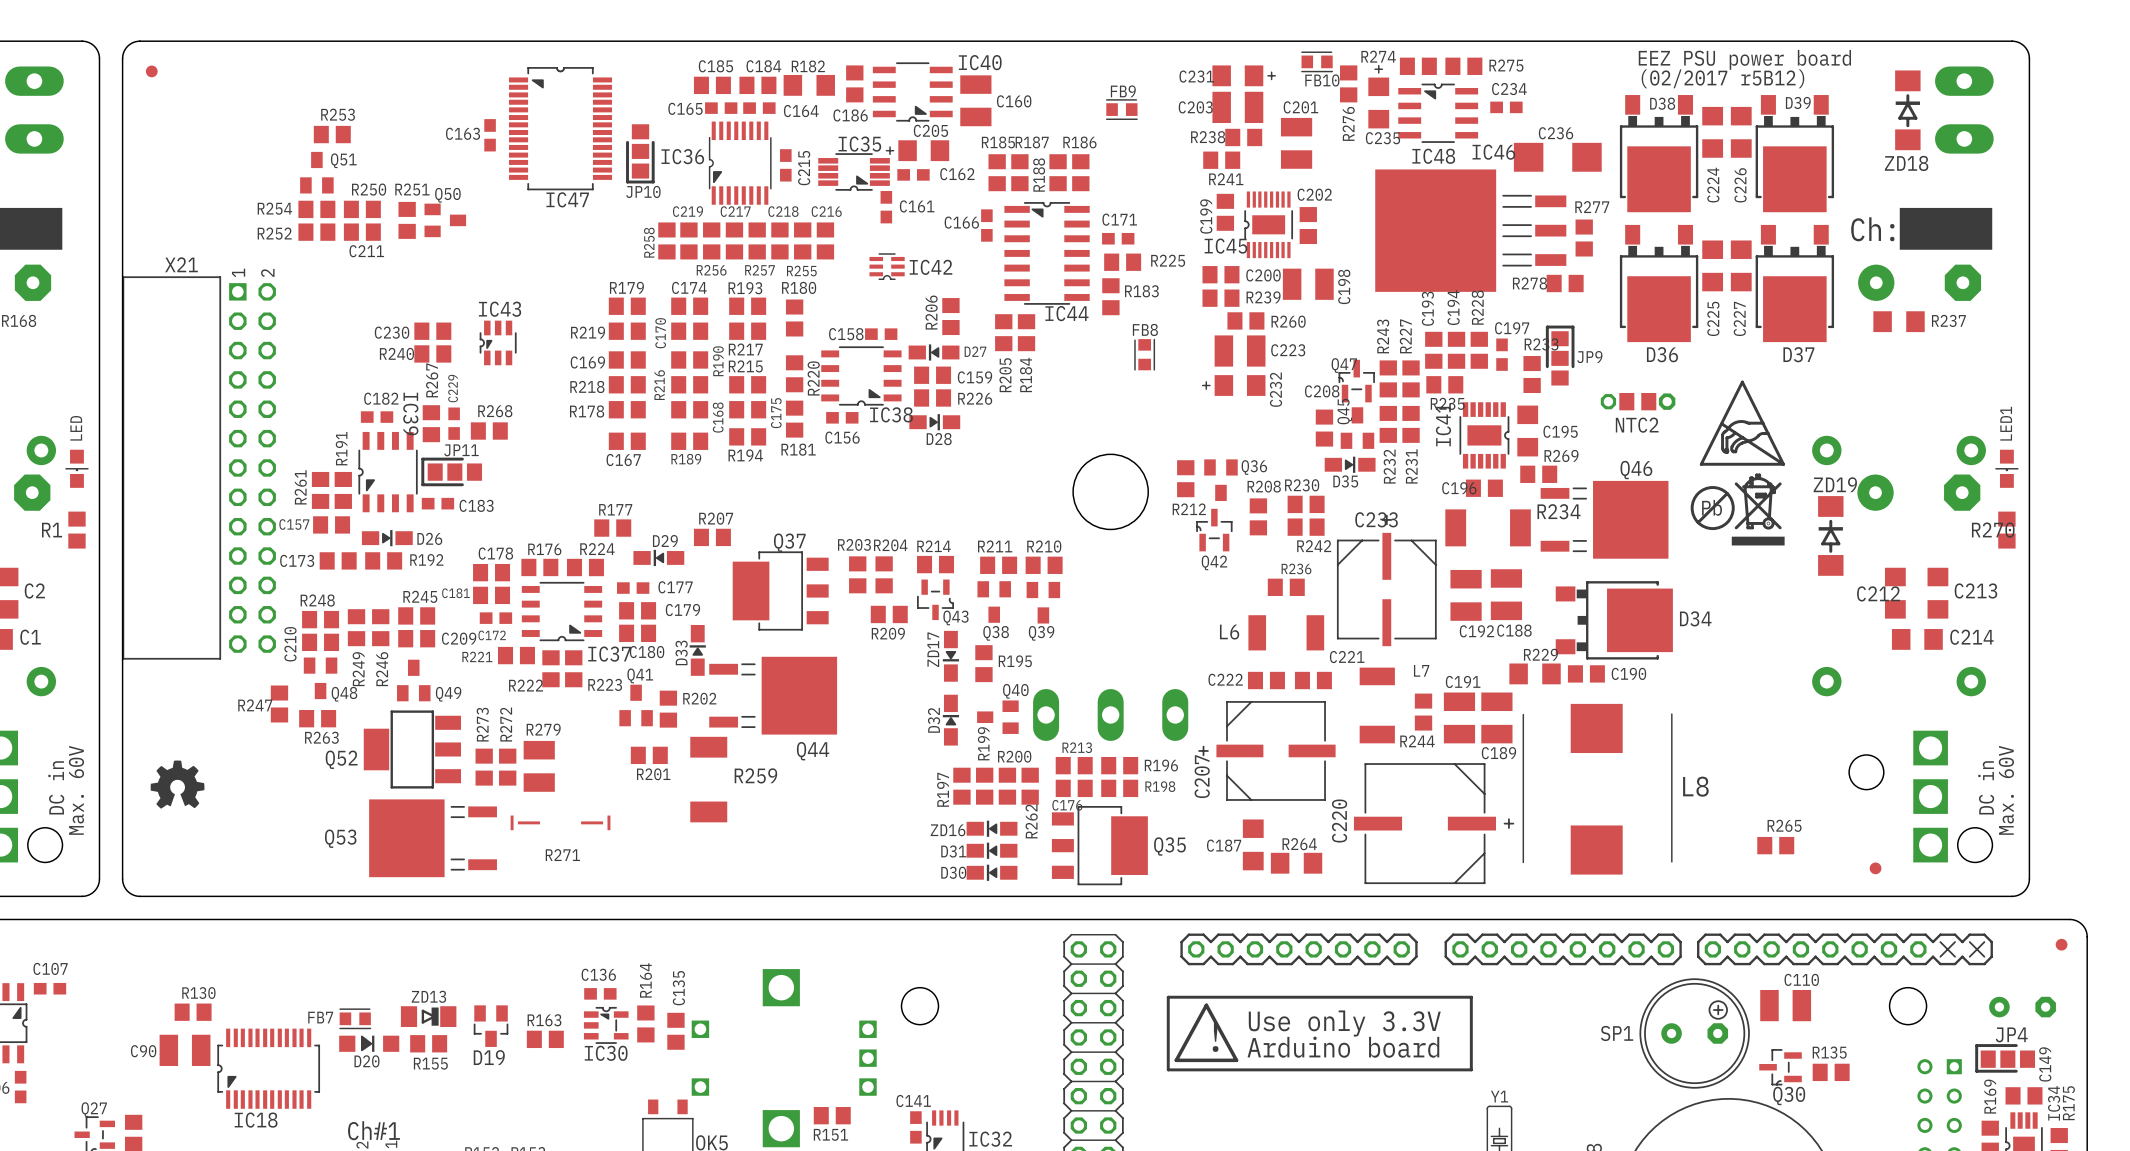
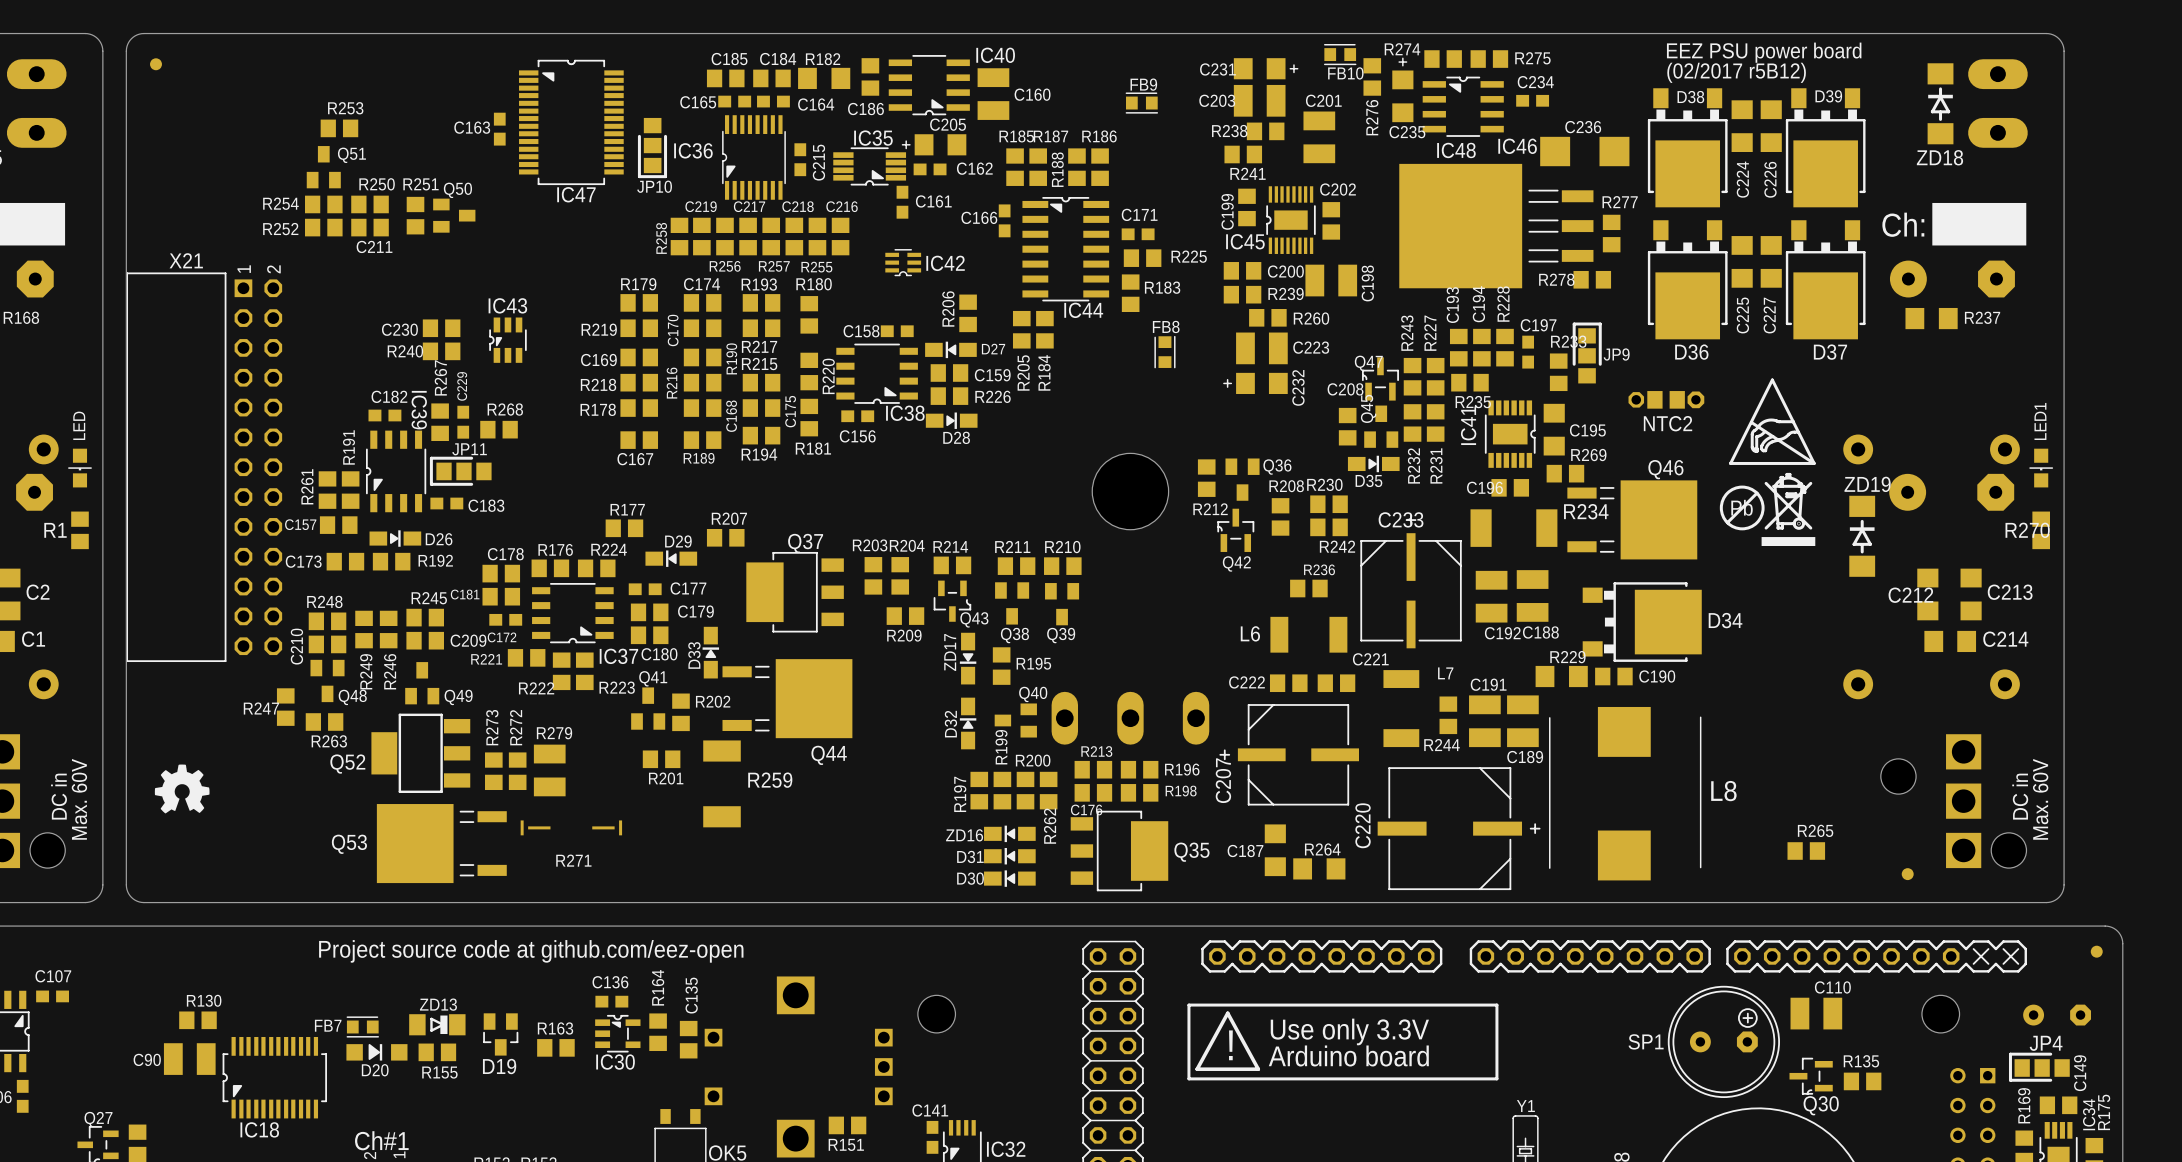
text: none -> Project source code at github.com/eez-open (531, 951)

